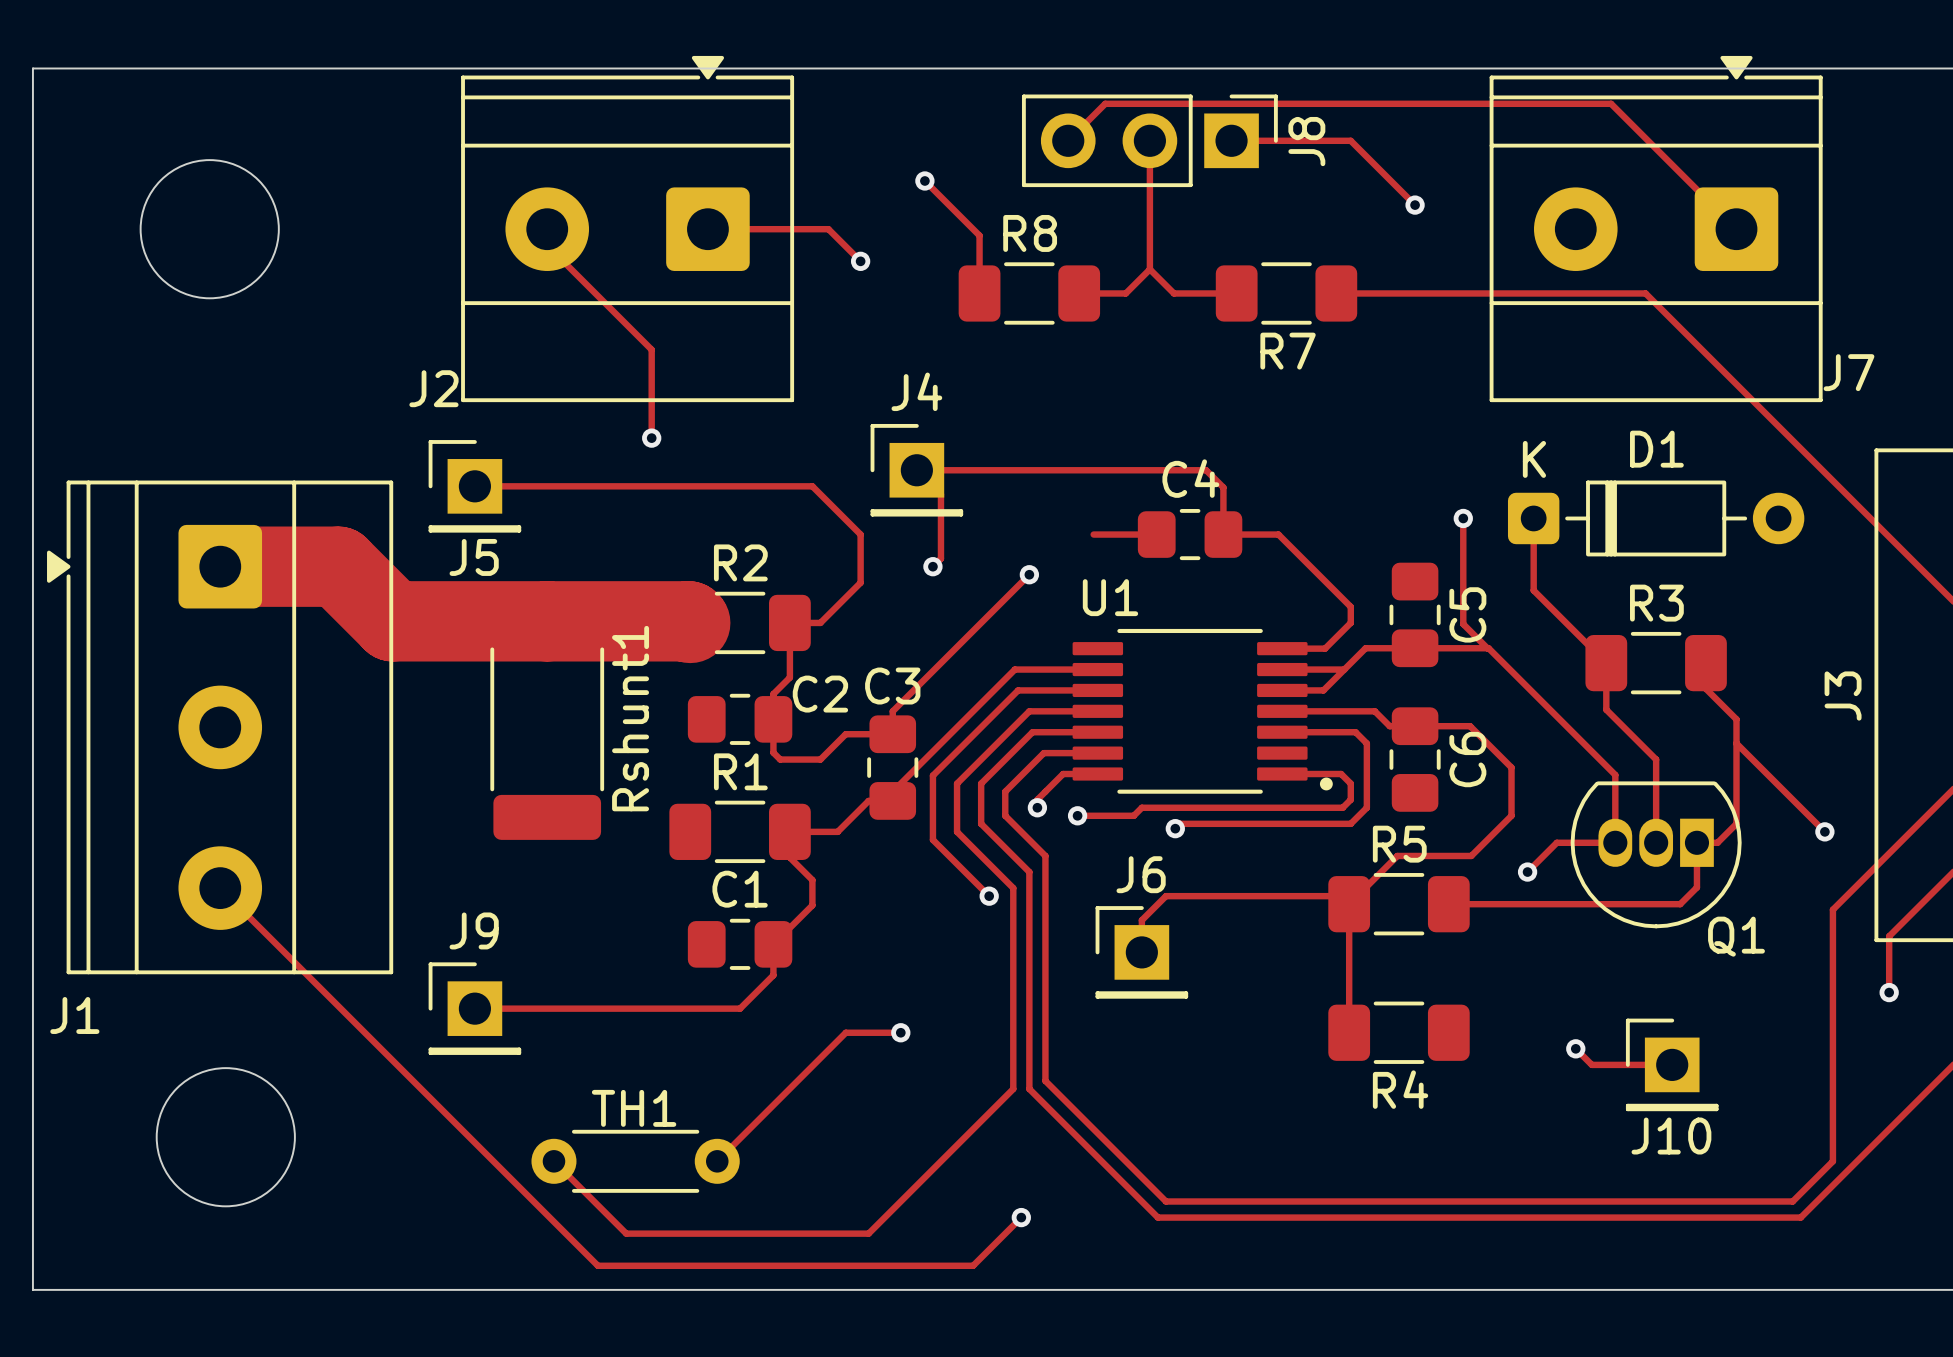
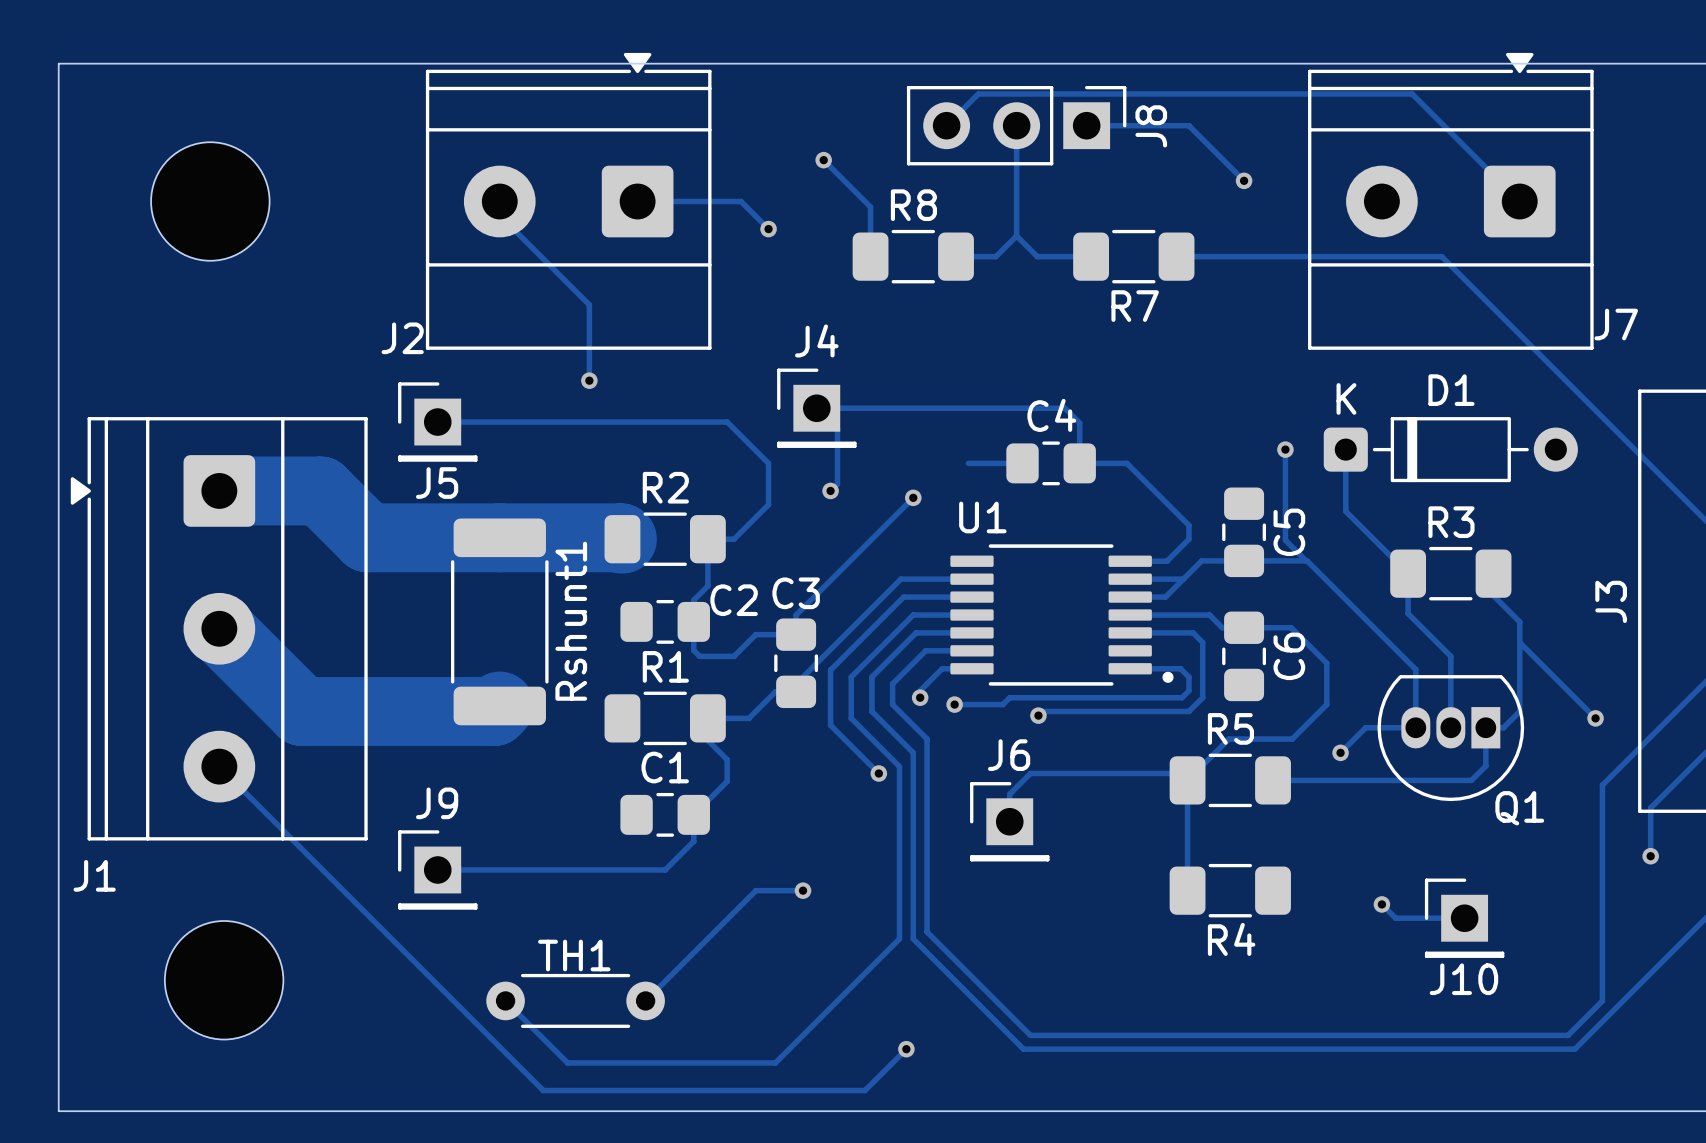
track: none -> (219, 628) (302, 711) (494, 711) (499, 705)

